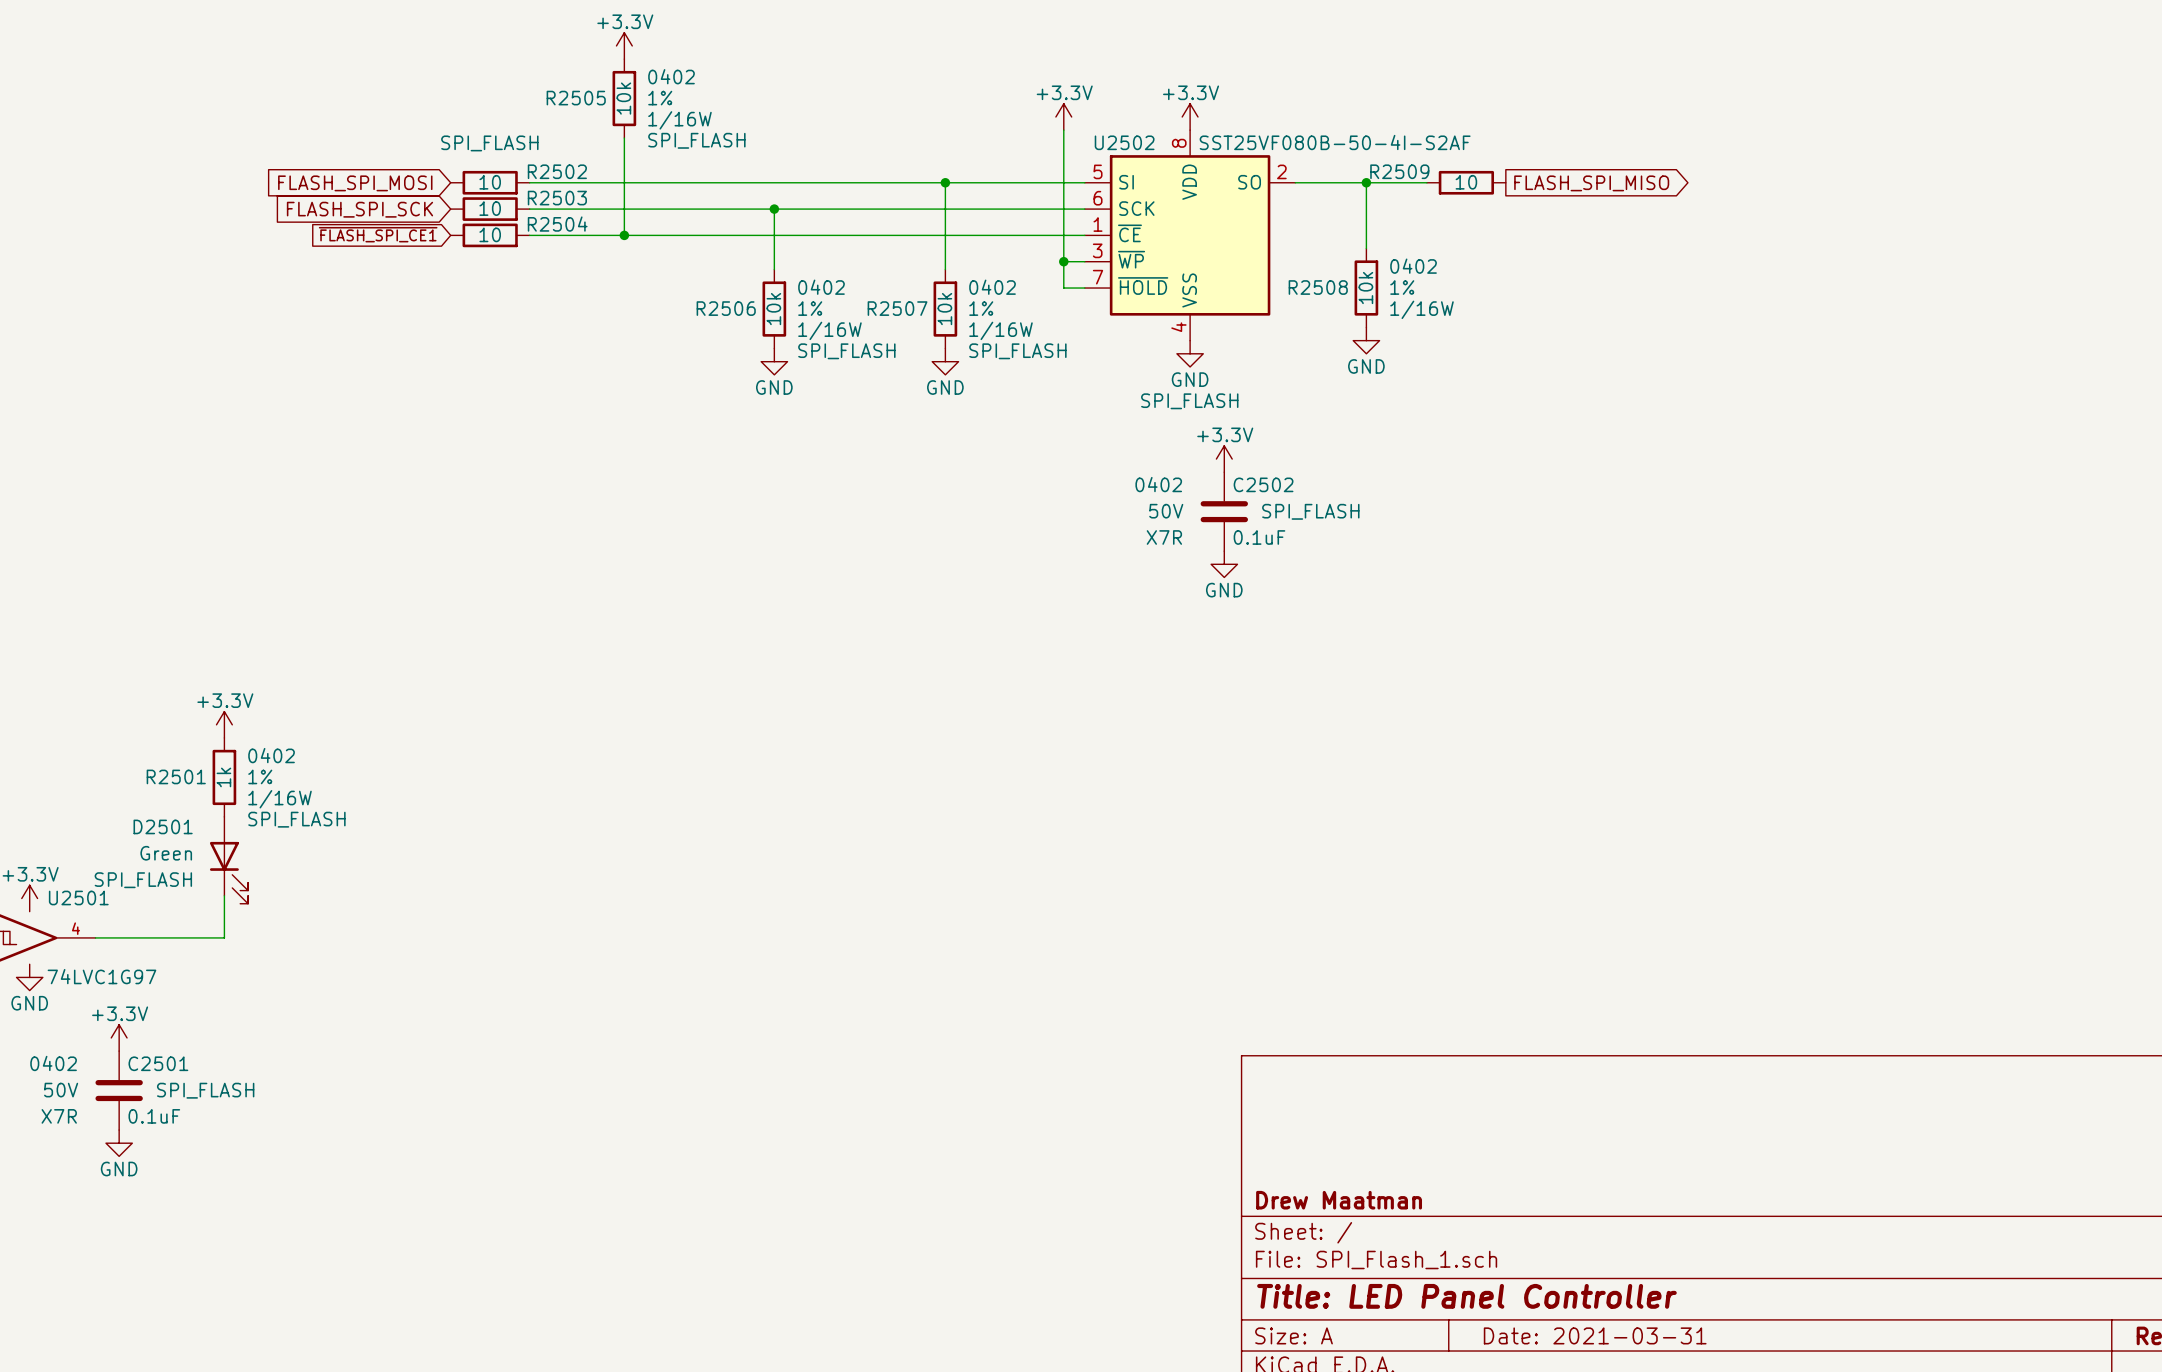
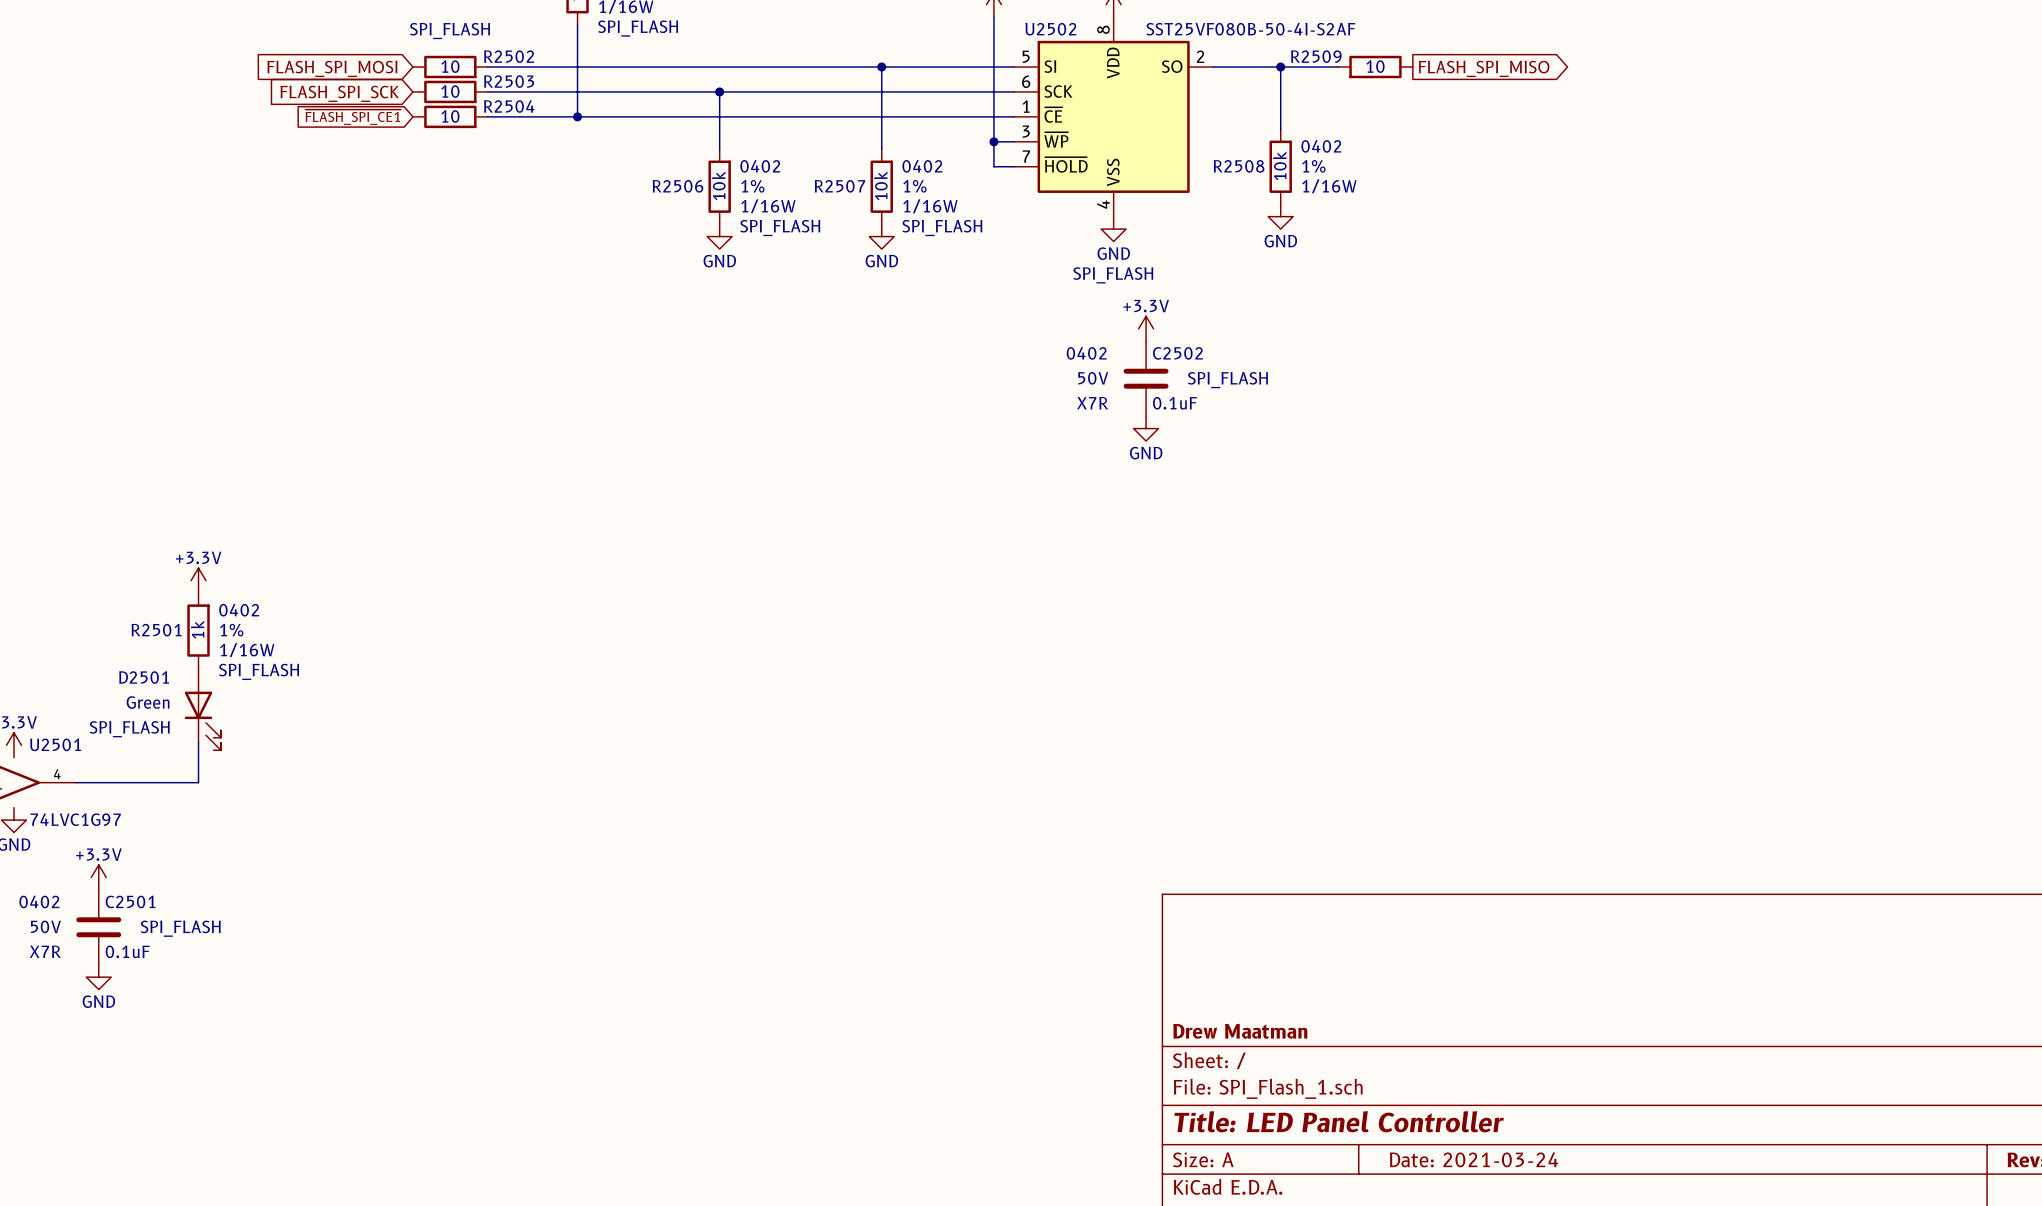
title block: Date: 2021-03-31 (1595, 1335) -> Date: 2021-03-24 (1474, 1159)

